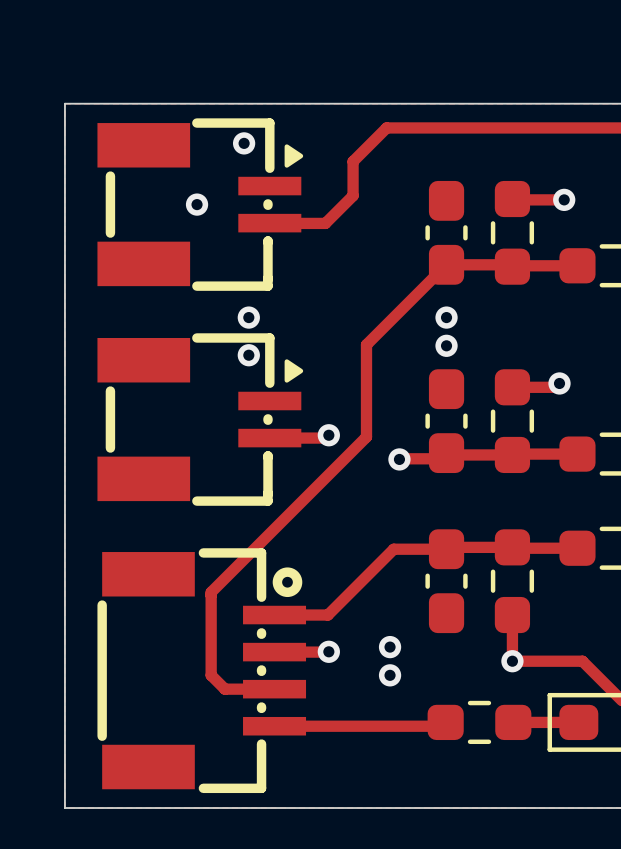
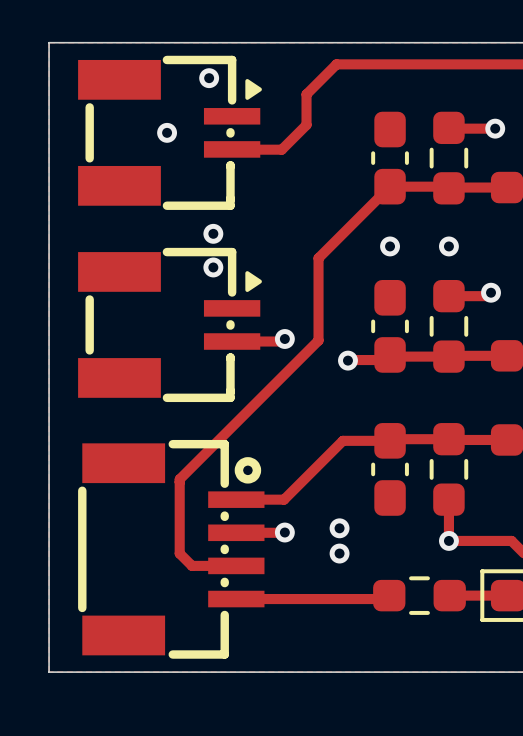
via: (446, 317) -> none
via: none -> (390, 246)
via: none -> (448, 246)
via: (446, 345) -> none

